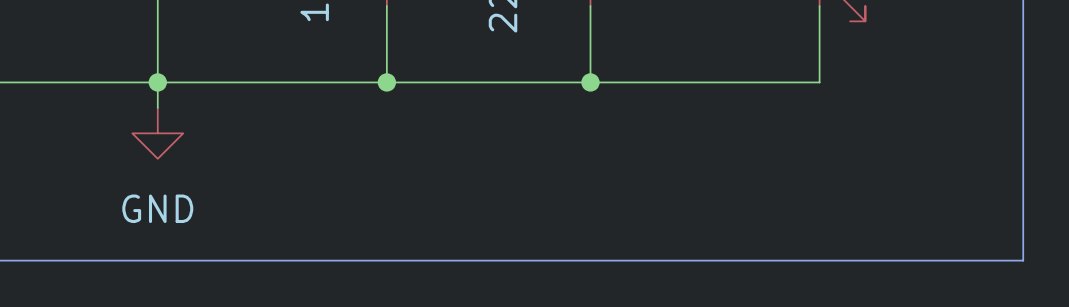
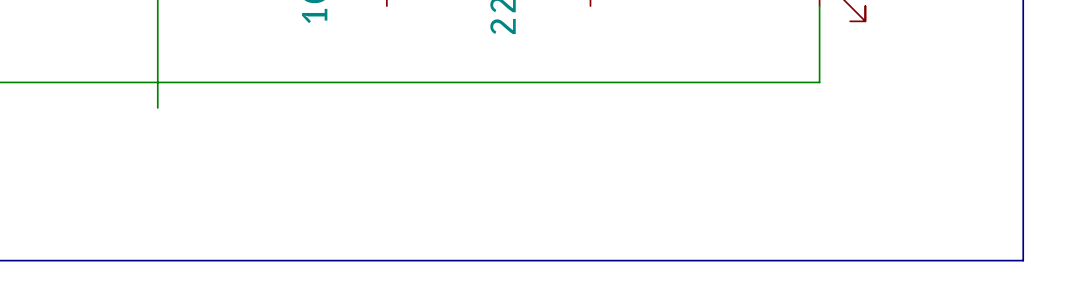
wire: (386, 6) (386, 82) -> none
wire: (590, 6) (590, 82) -> none
junction: (157, 82) -> none
junction: (386, 82) -> none
junction: (590, 82) -> none
power symbol: GND (157, 133) -> none

